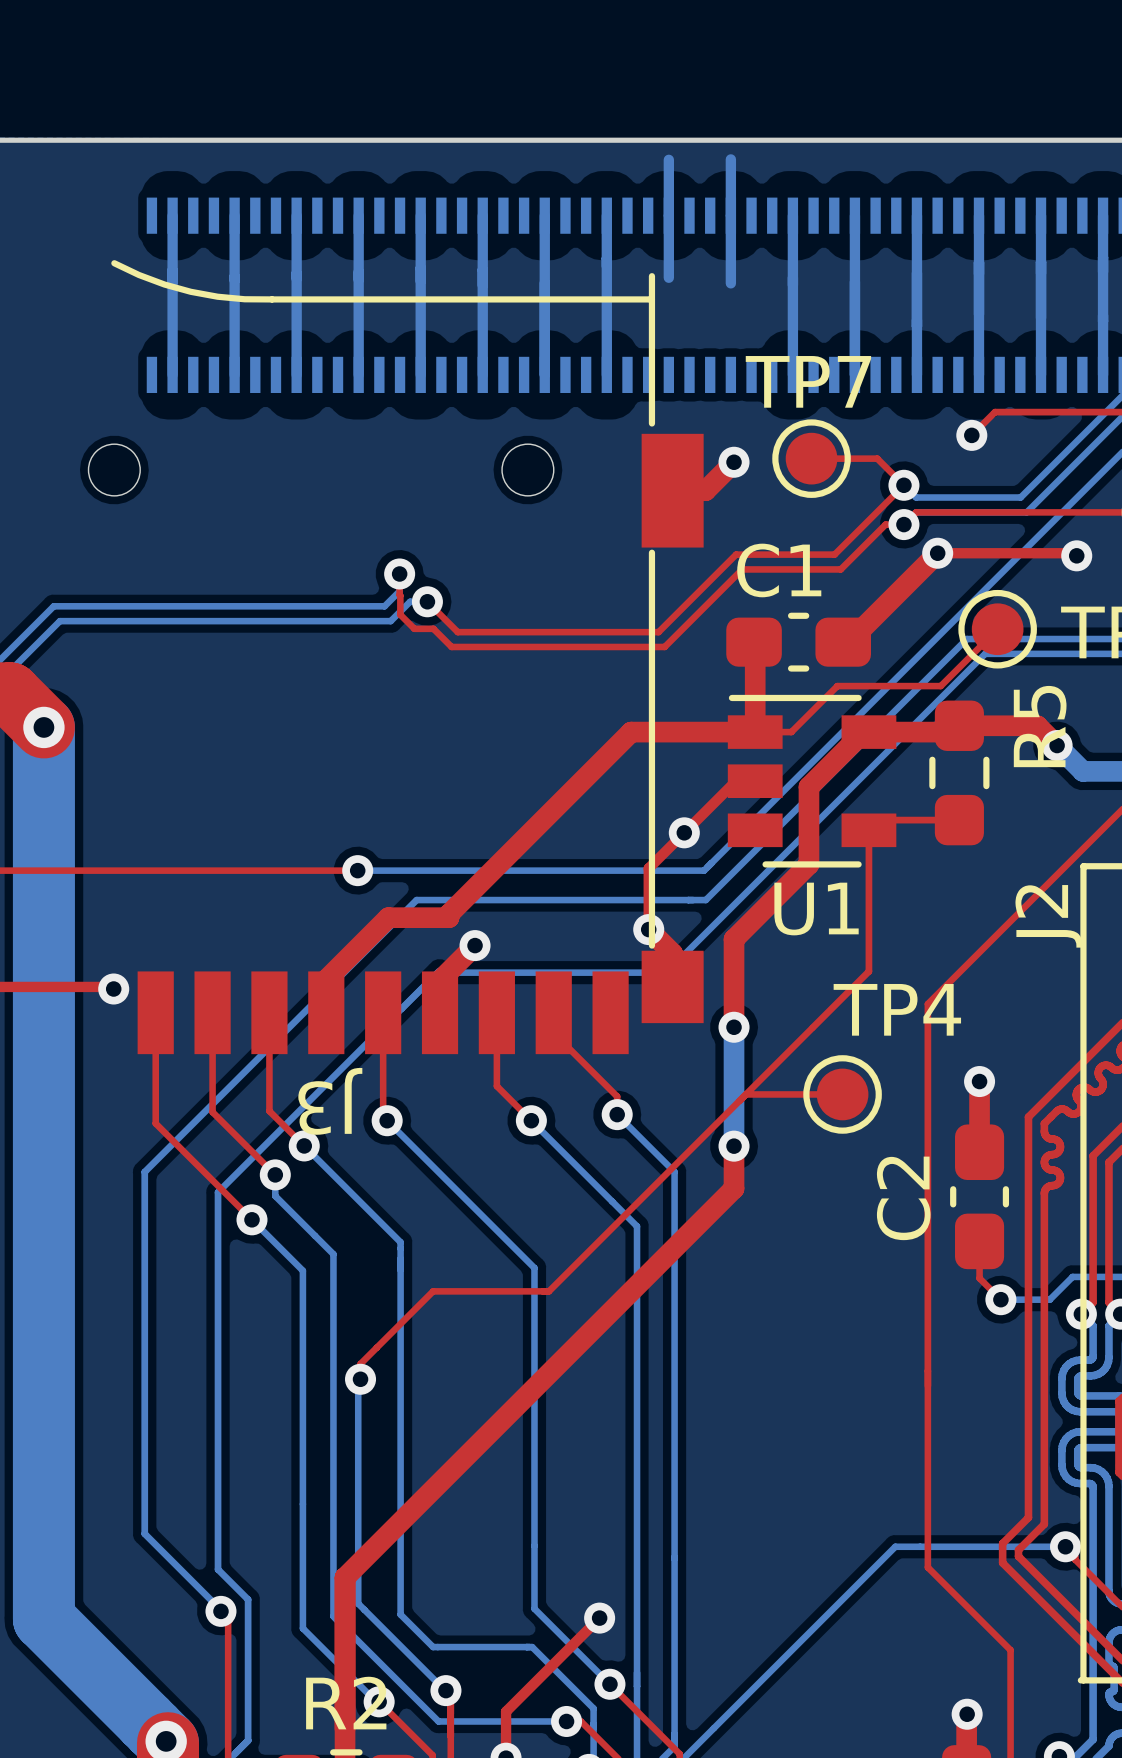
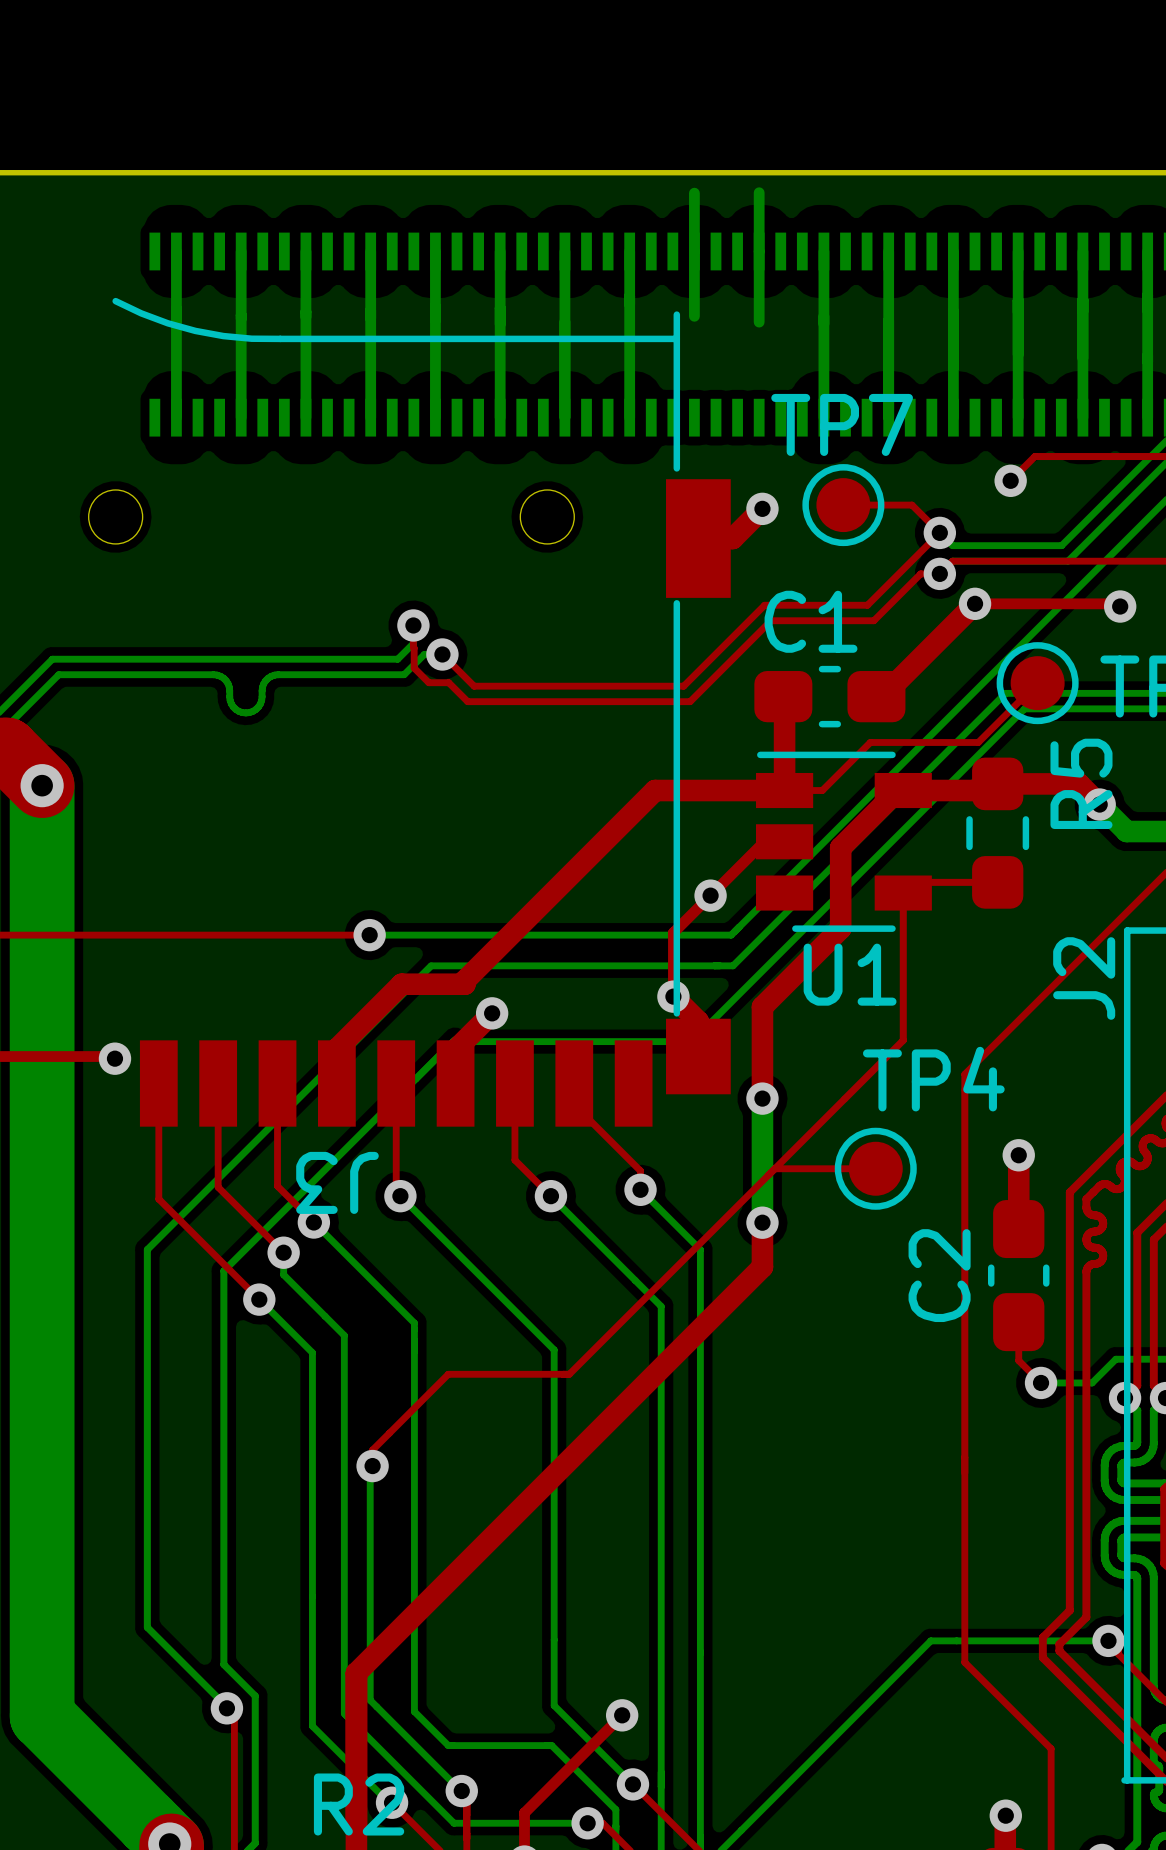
bottom track: (208, 621) (270, 621) -> (213, 674) (220, 676) (228, 683) (230, 700) (233, 706) (238, 711) (245, 712) (252, 711) (260, 703) (262, 687) (265, 680) (271, 676) (278, 674)

